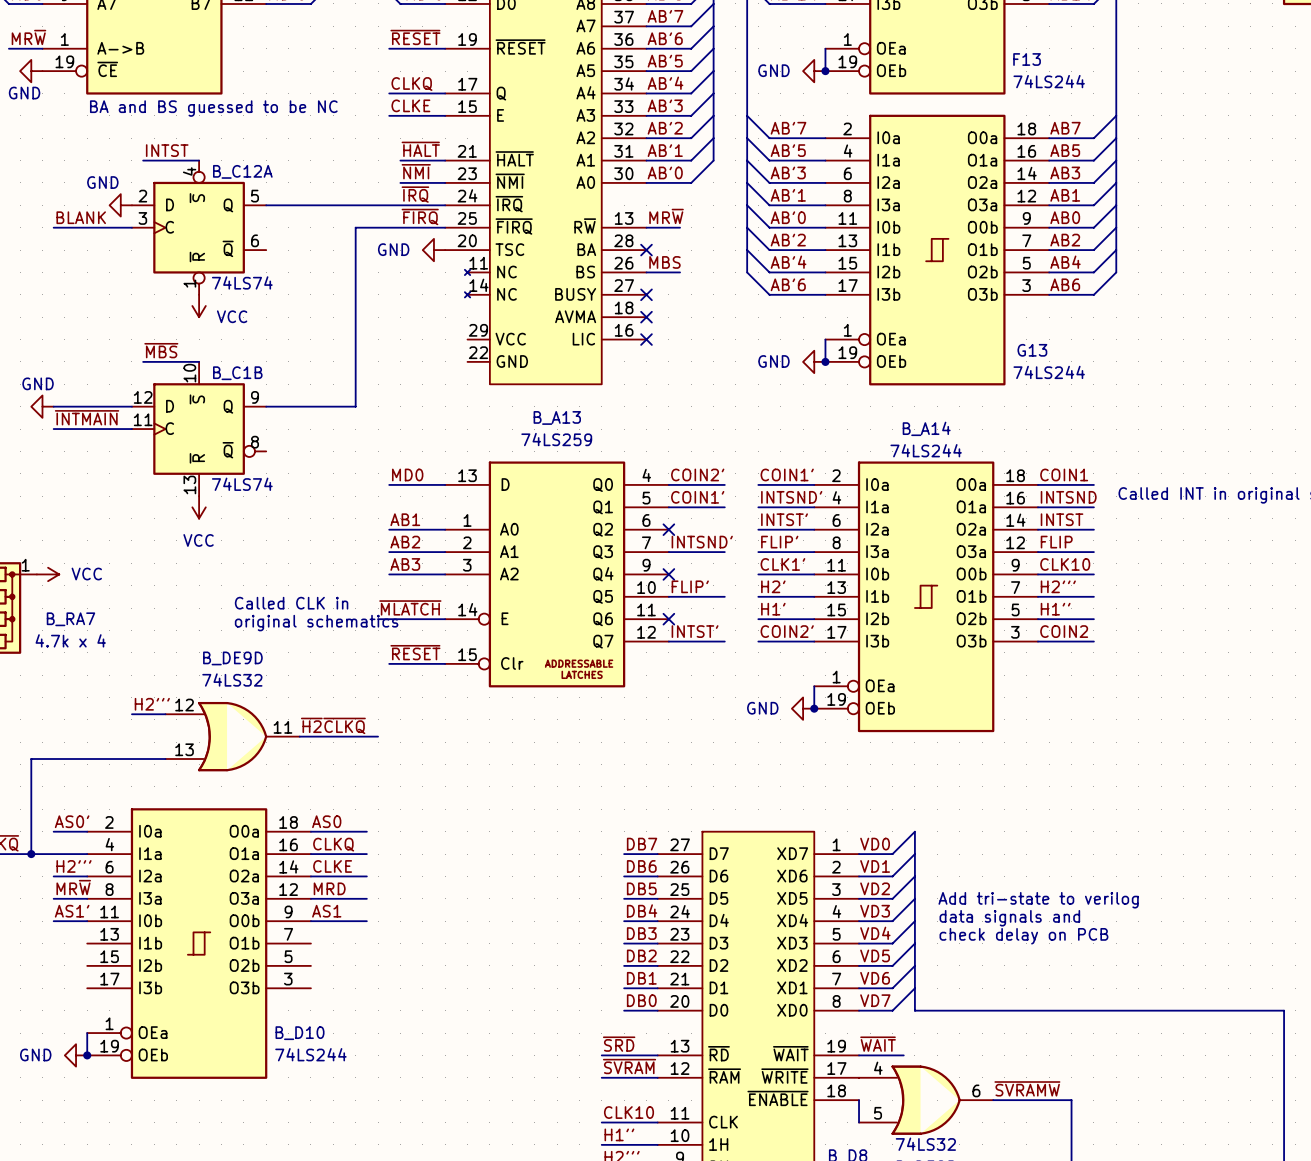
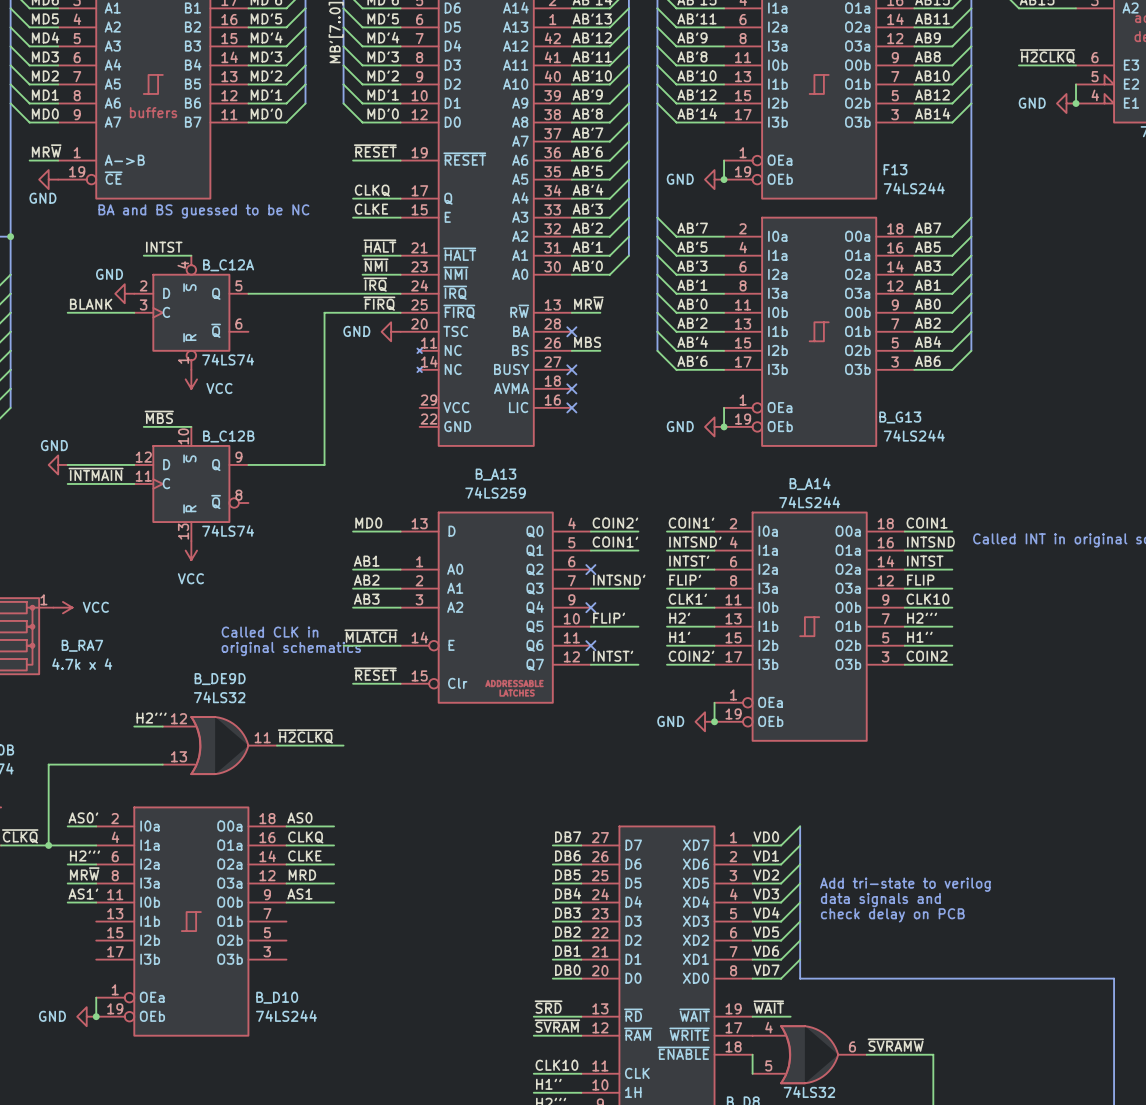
G13 name: G13 (1032, 350) -> B_G13 (900, 417)
B_C1B name: B_C1B (237, 373) -> B_C12B (228, 436)

